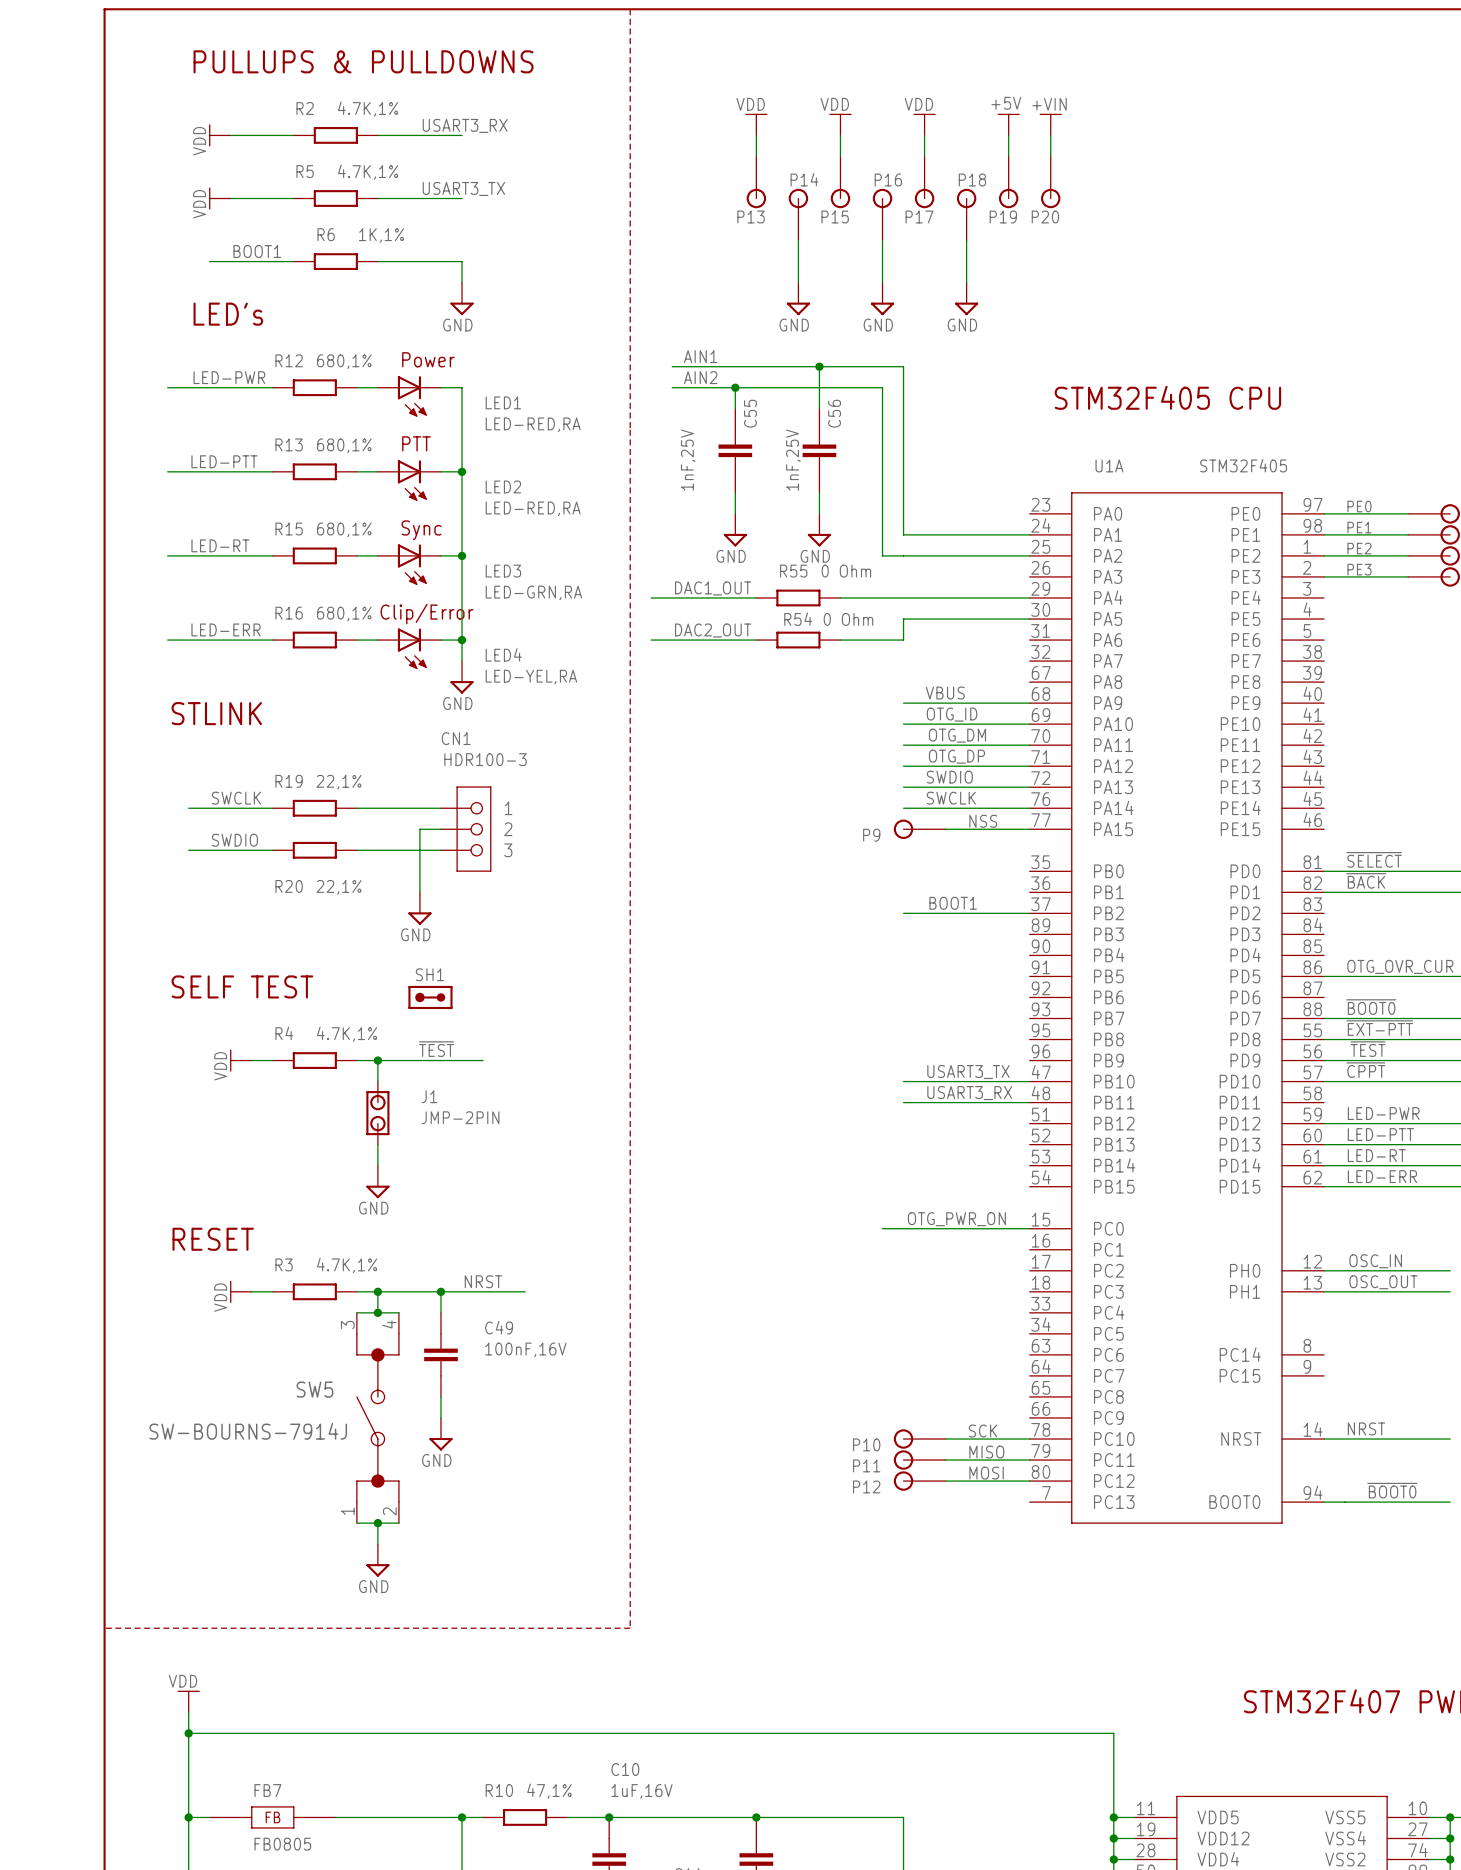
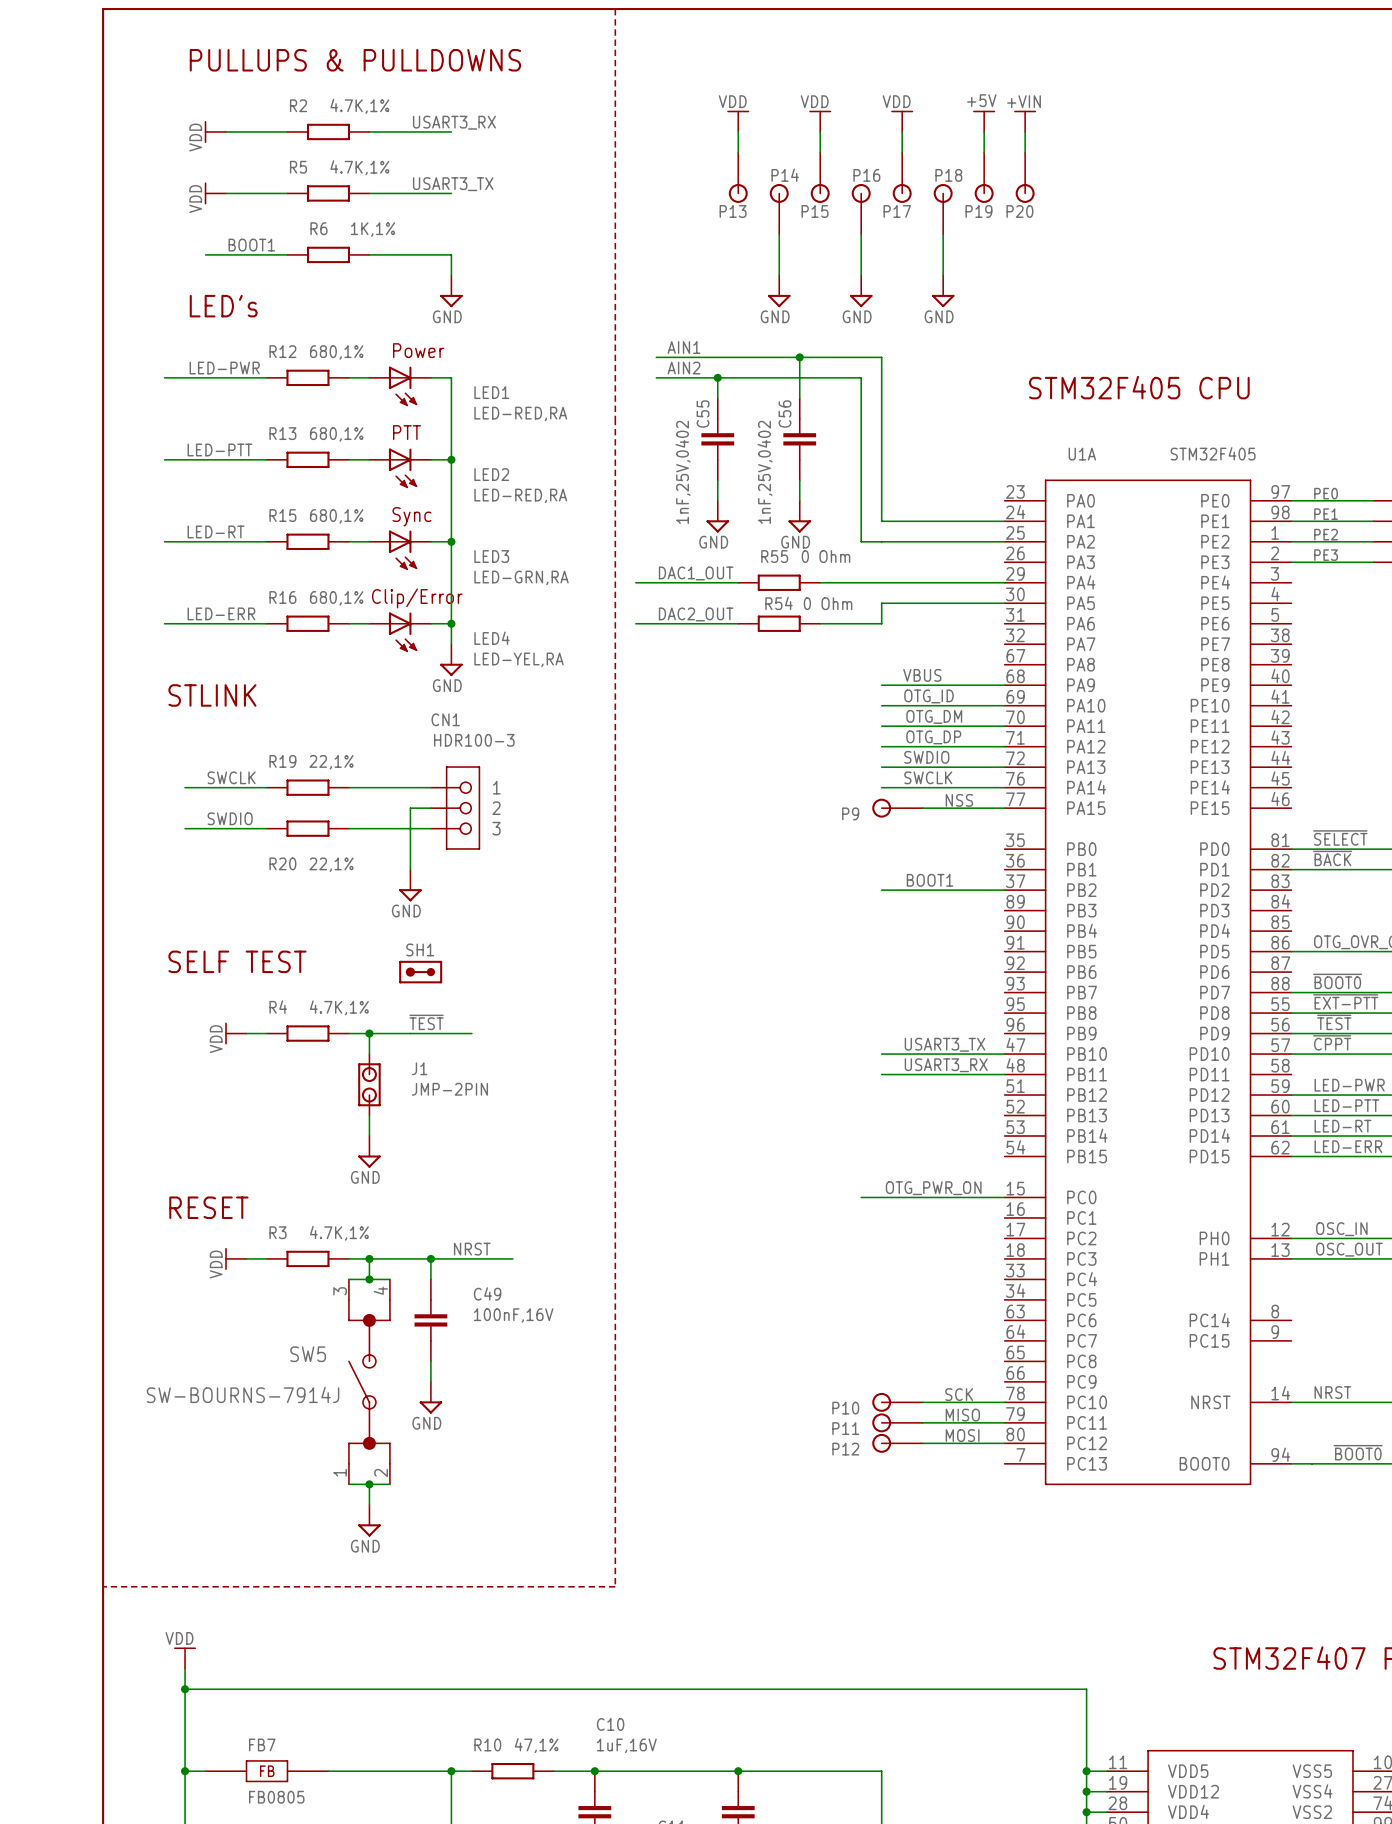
C55 name position: C55 (750, 413) -> C55 (703, 414)
C56 name position: C56 (834, 413) -> C56 (784, 414)
C55 value: 1nF,25V (688, 460) -> 1nF,25V,0402 (683, 472)
C56 value: 1nF,25V (793, 460) -> 1nF,25V,0402 (765, 472)

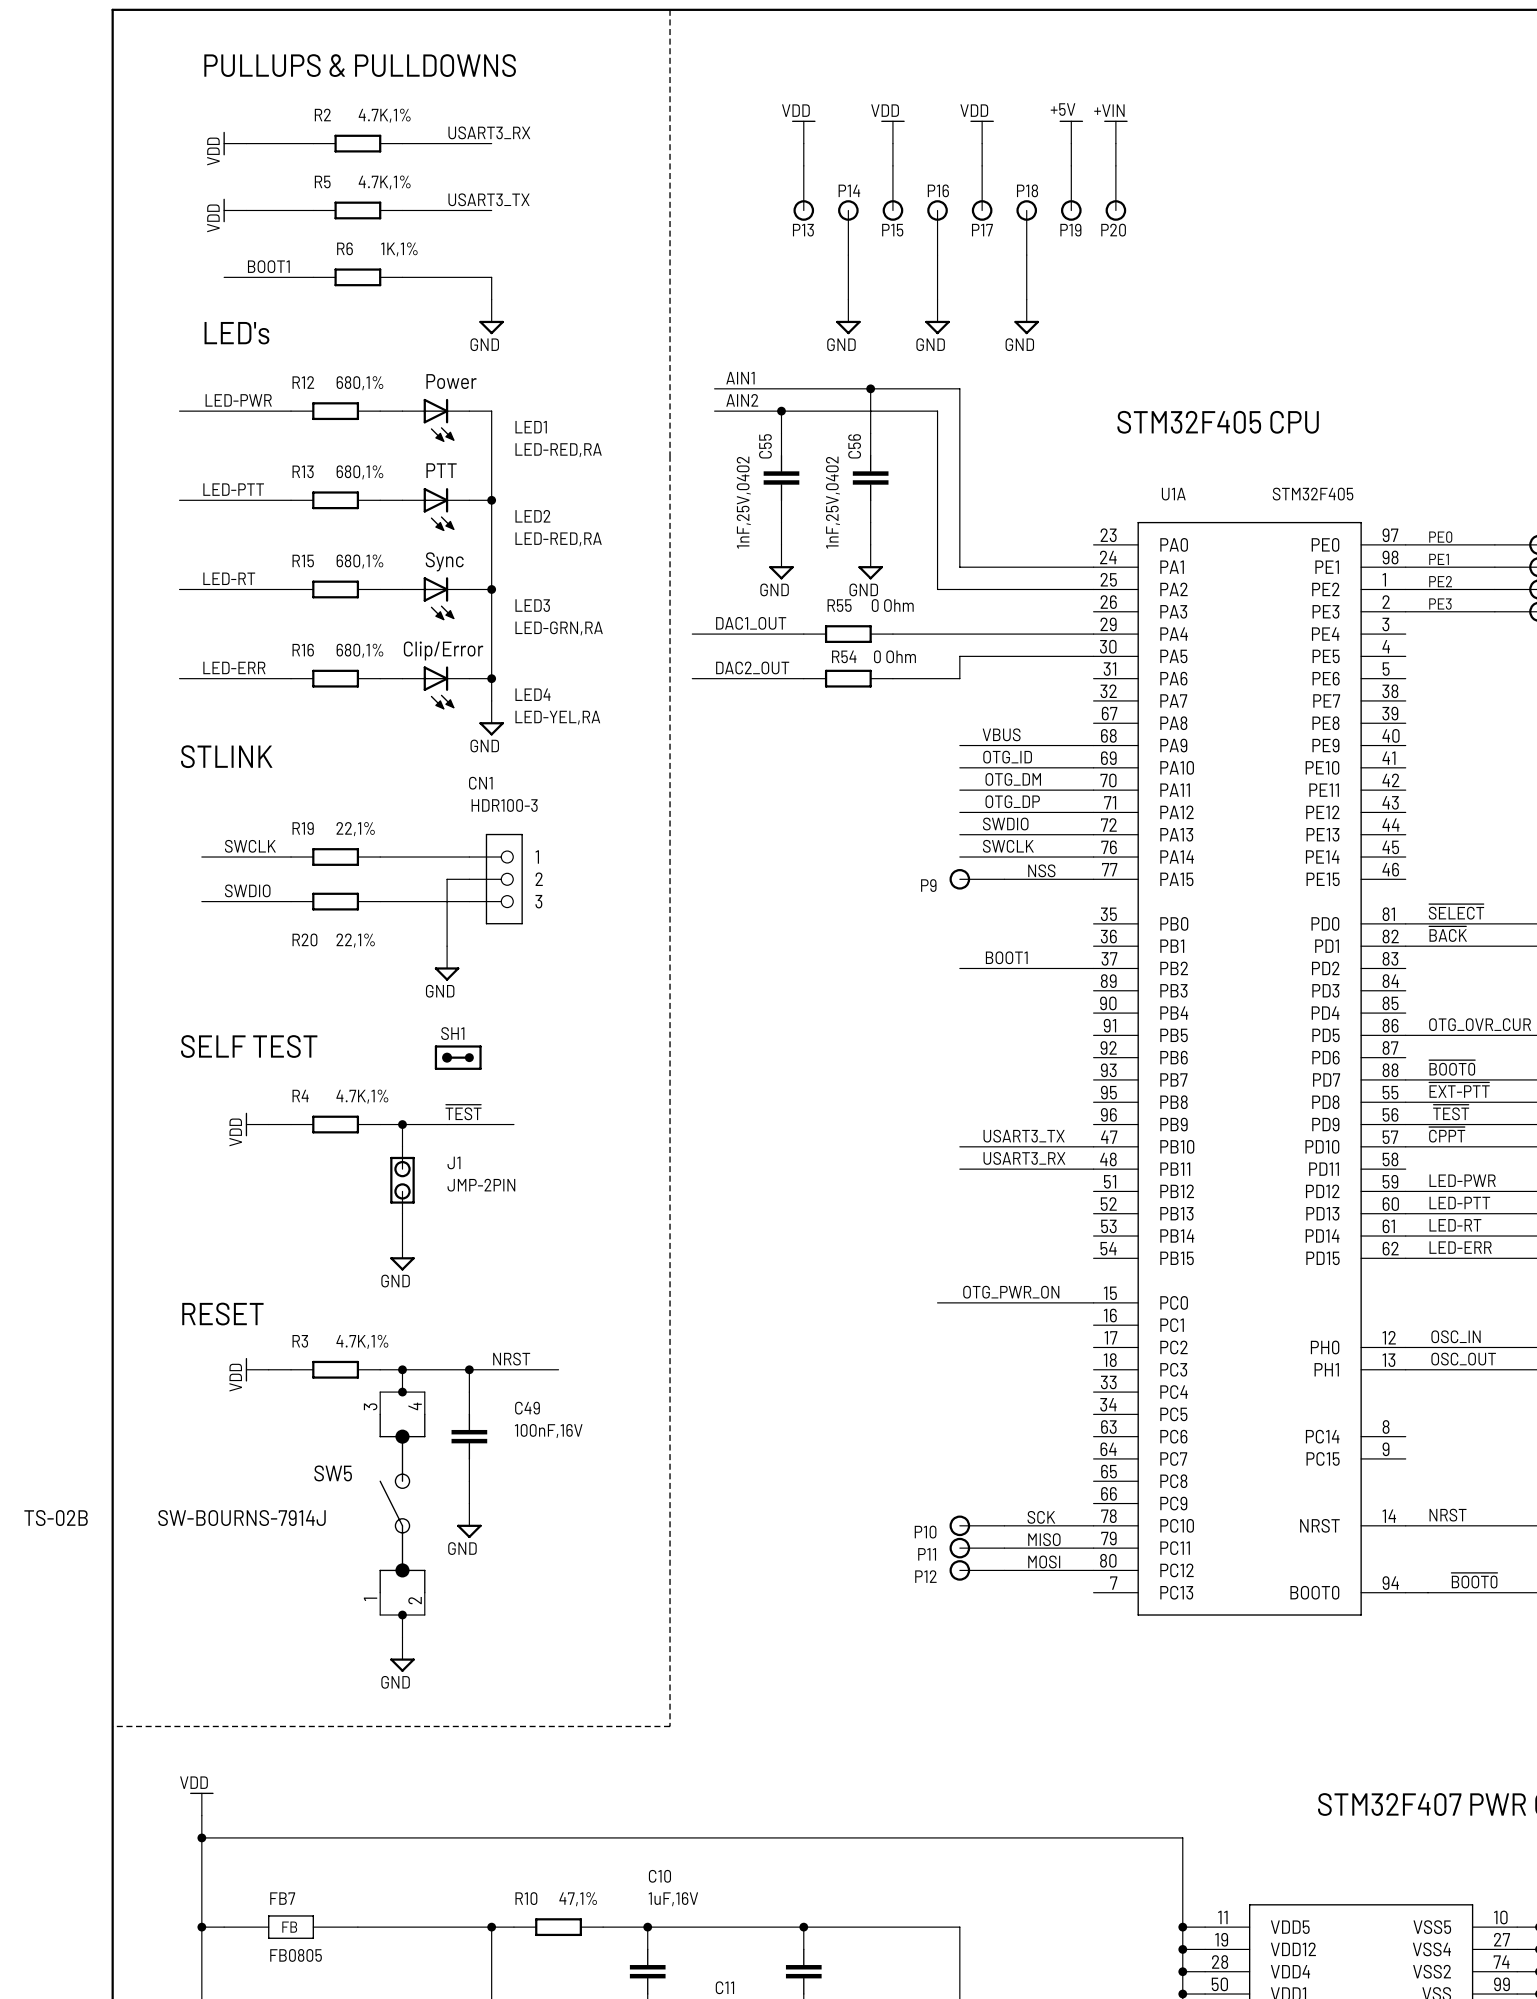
text: none -> TS-02B (56, 1518)

